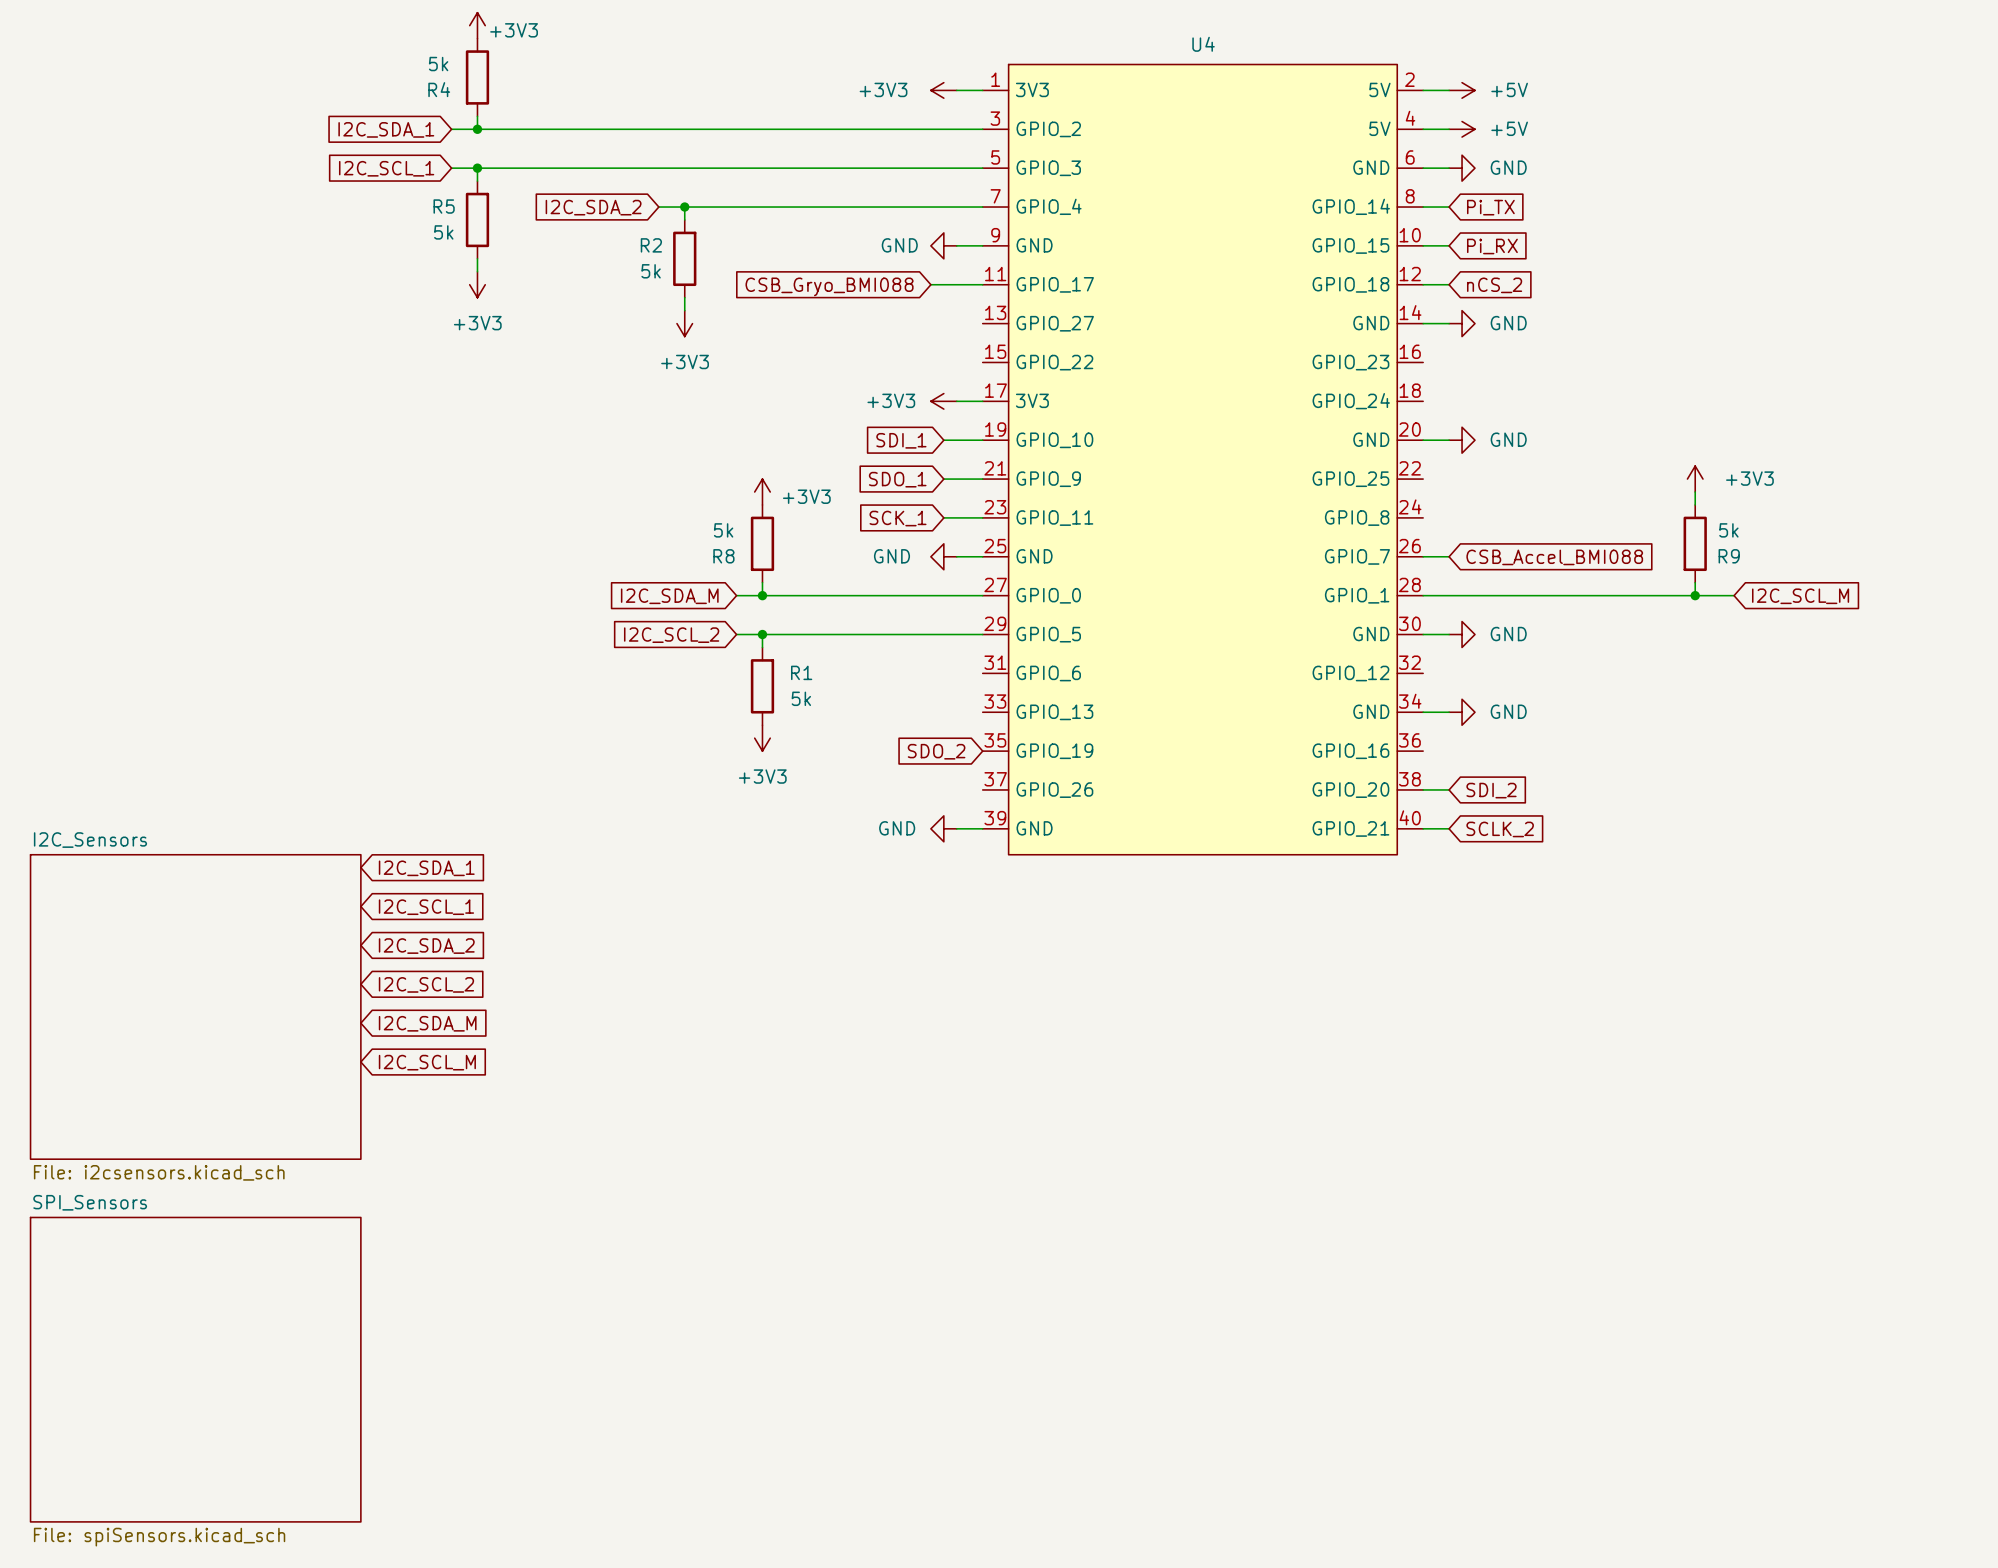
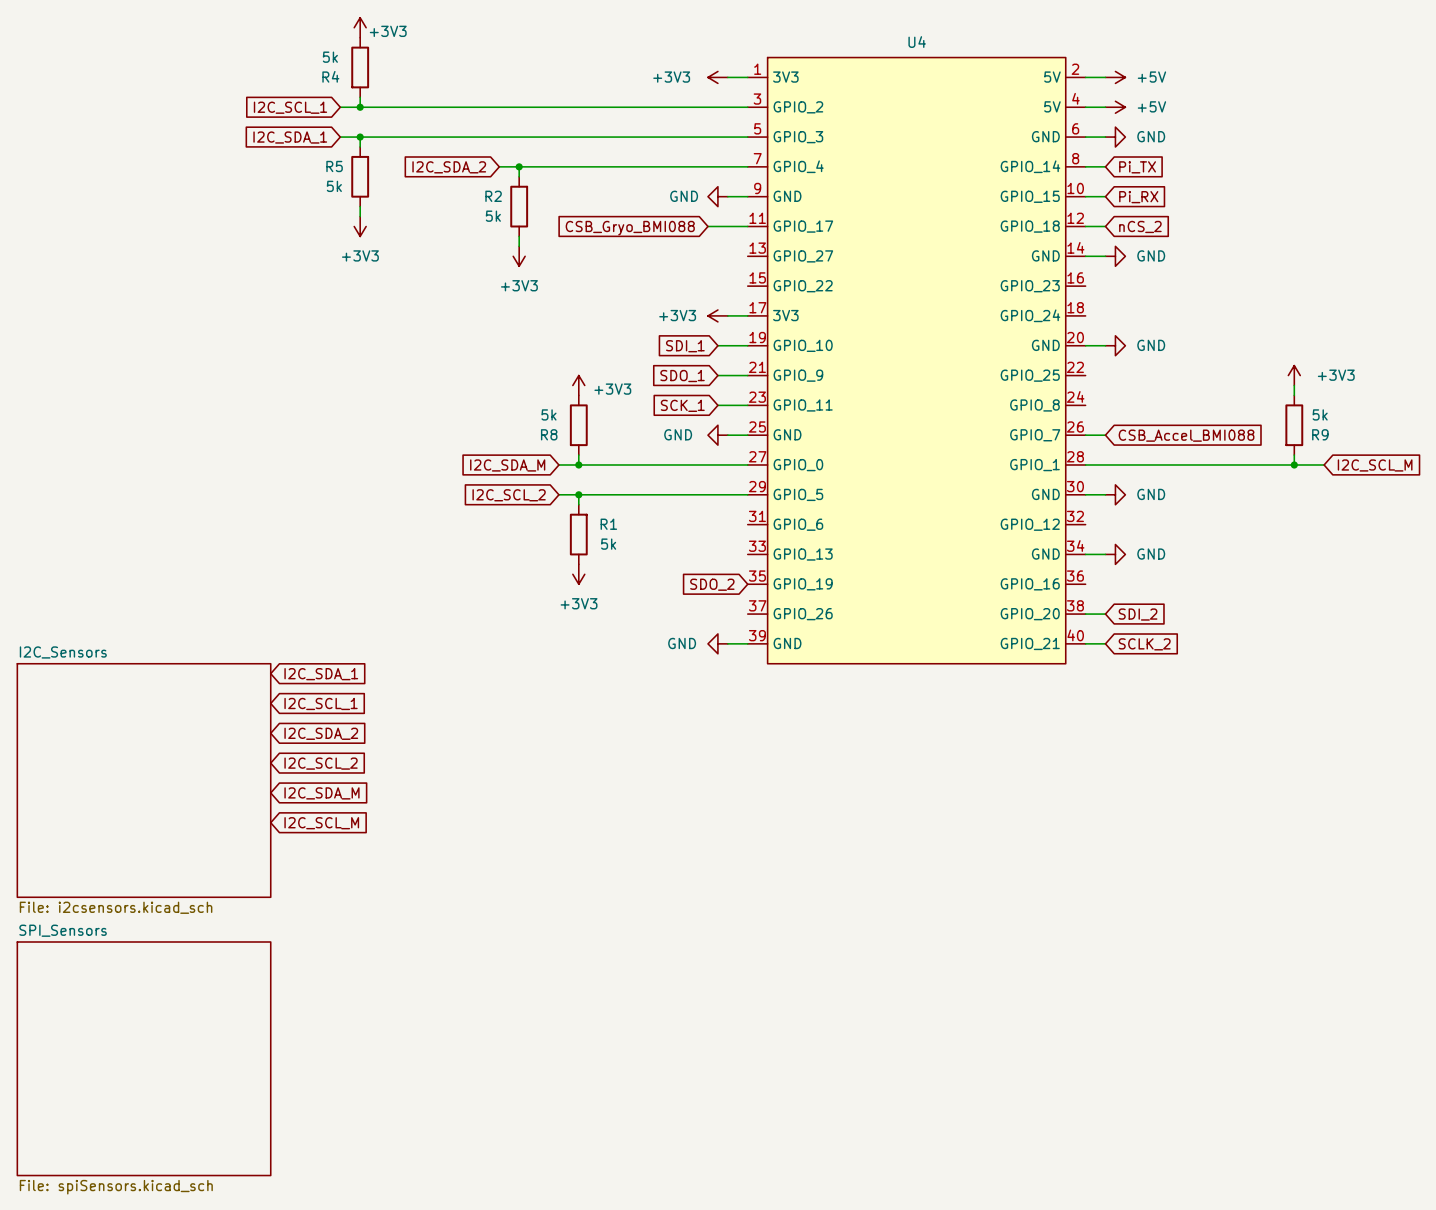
global label: I2C_SDA_1 (386, 129) -> I2C_SCL_1 (290, 107)
global label: I2C_SCL_1 (386, 168) -> I2C_SDA_1 (290, 137)

